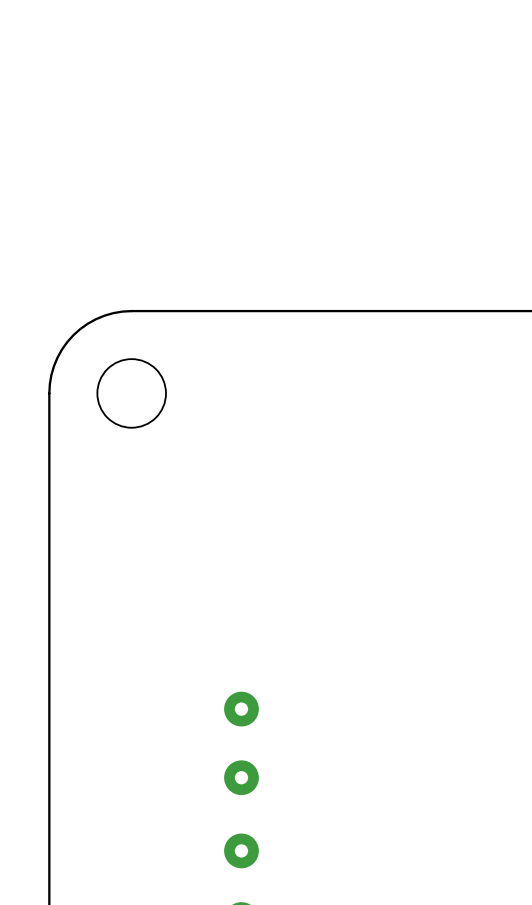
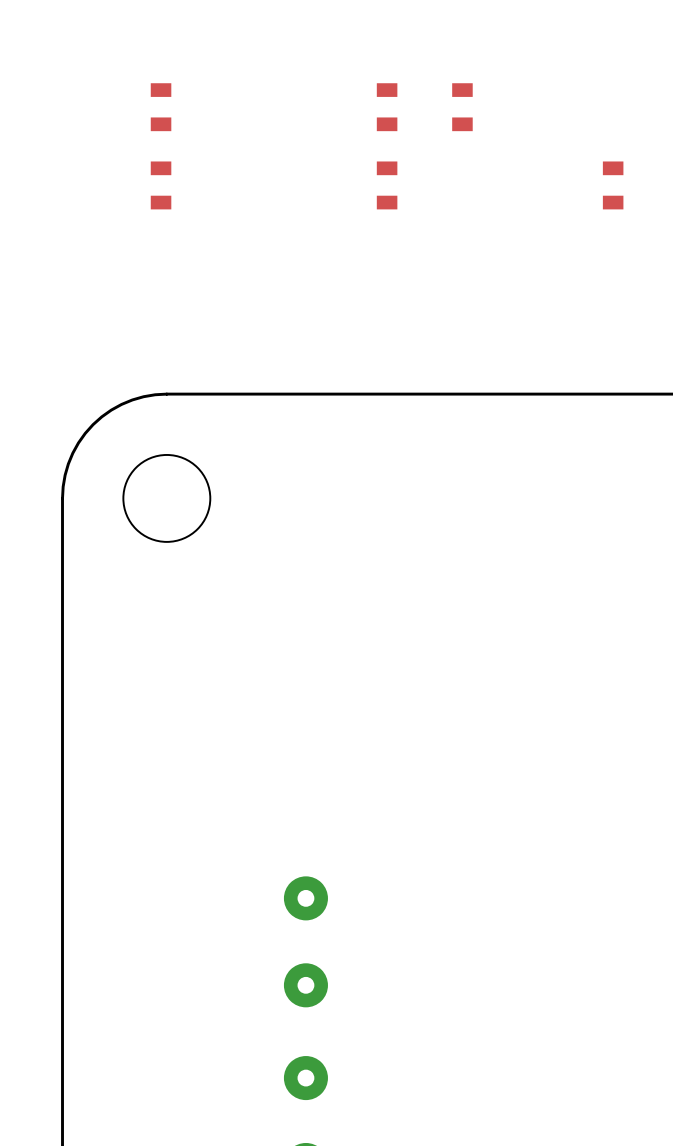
part: none -> (161, 107)
part: none -> (387, 107)
part: none -> (462, 107)
part: none -> (161, 185)
part: none -> (387, 185)
part: none -> (613, 185)

